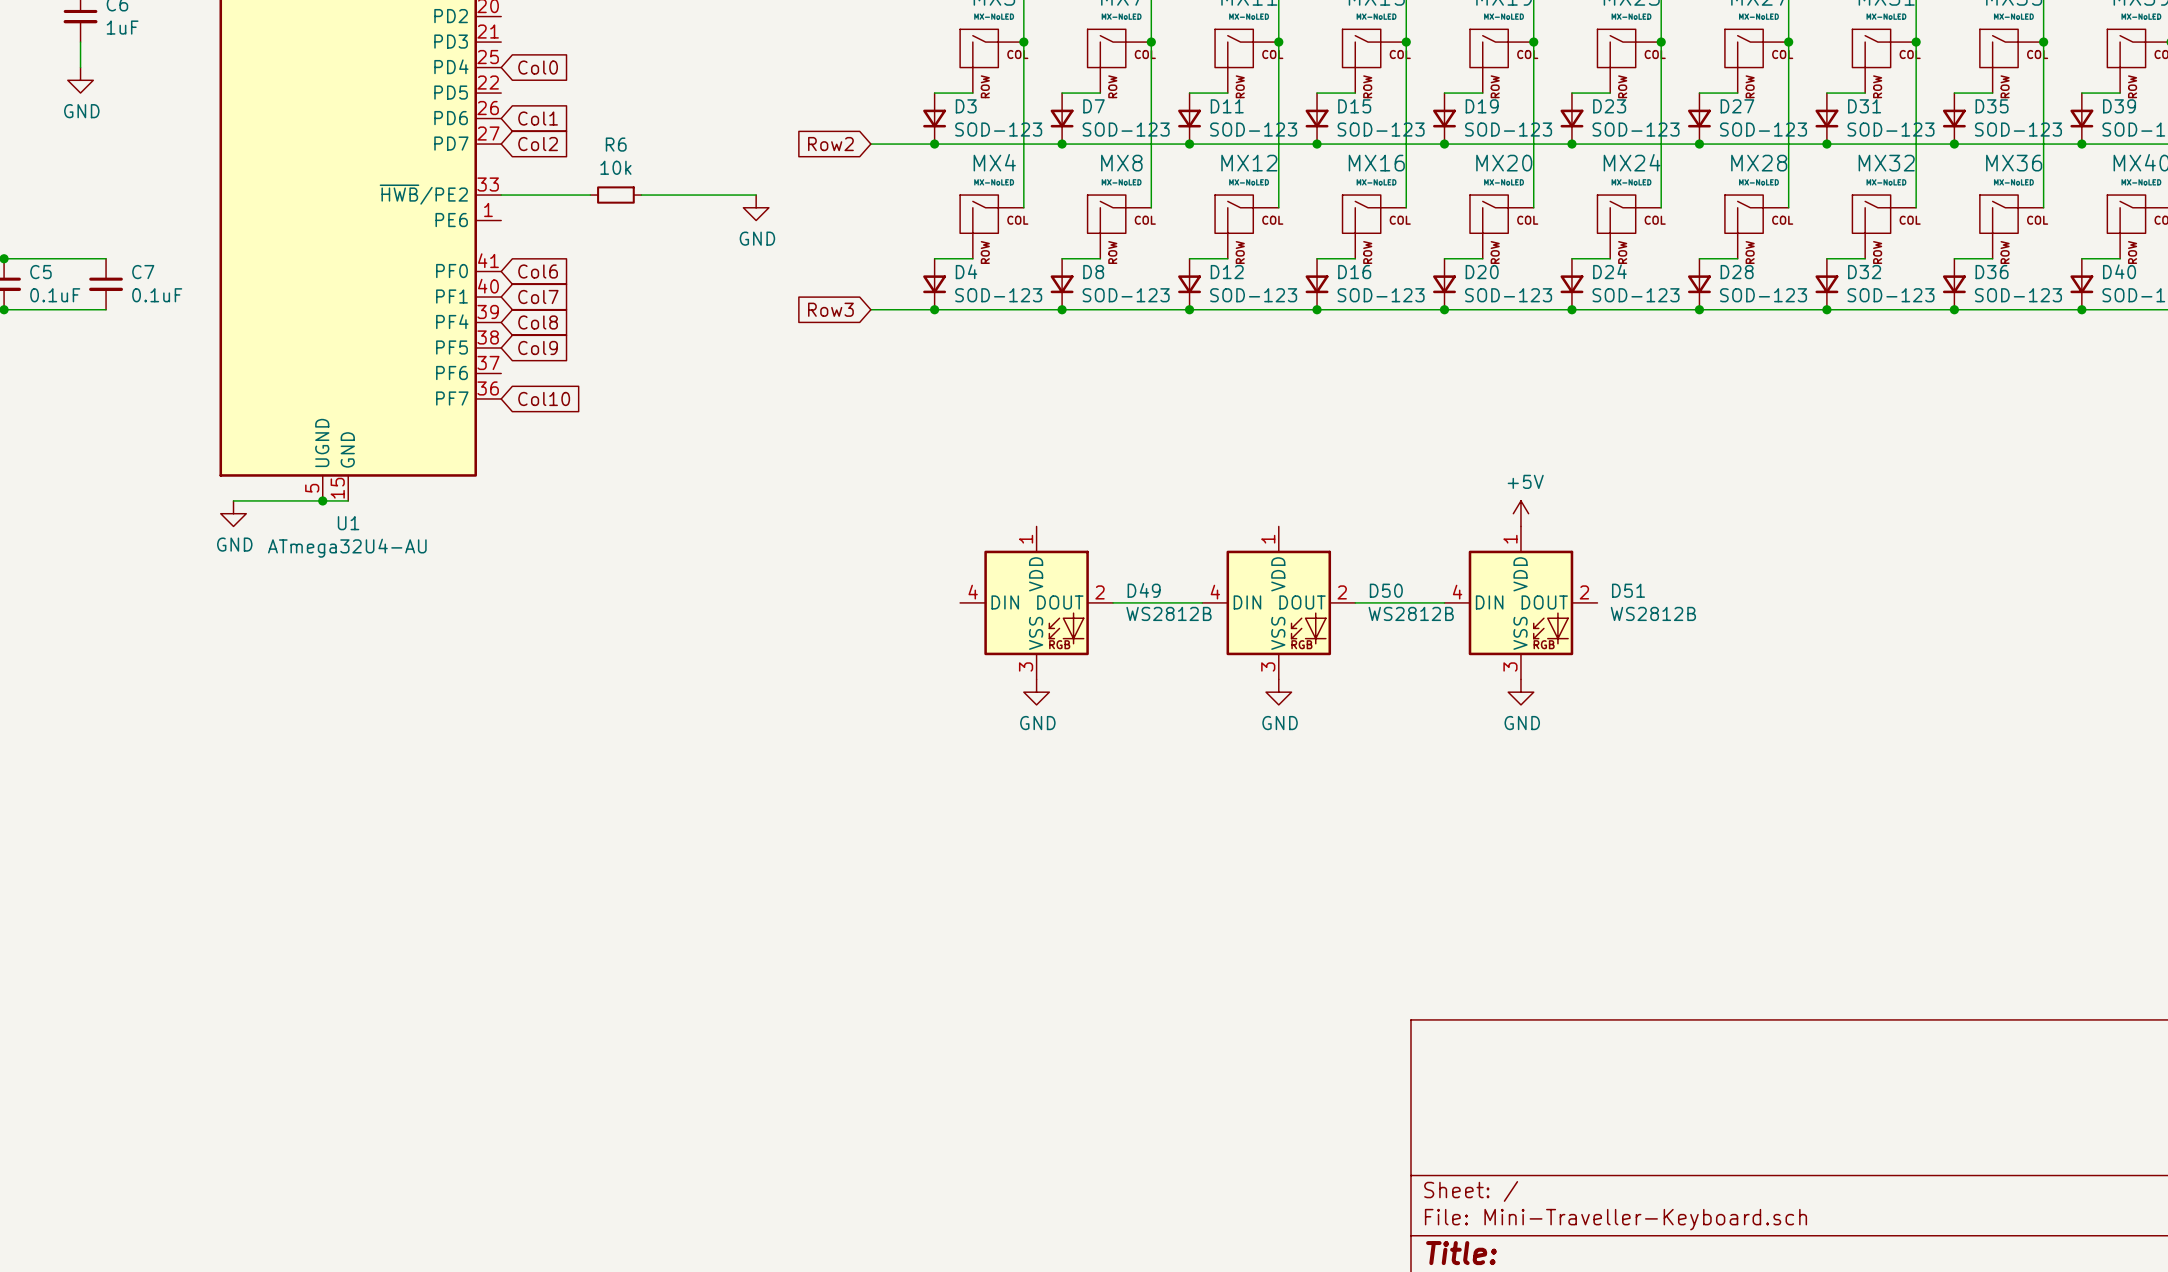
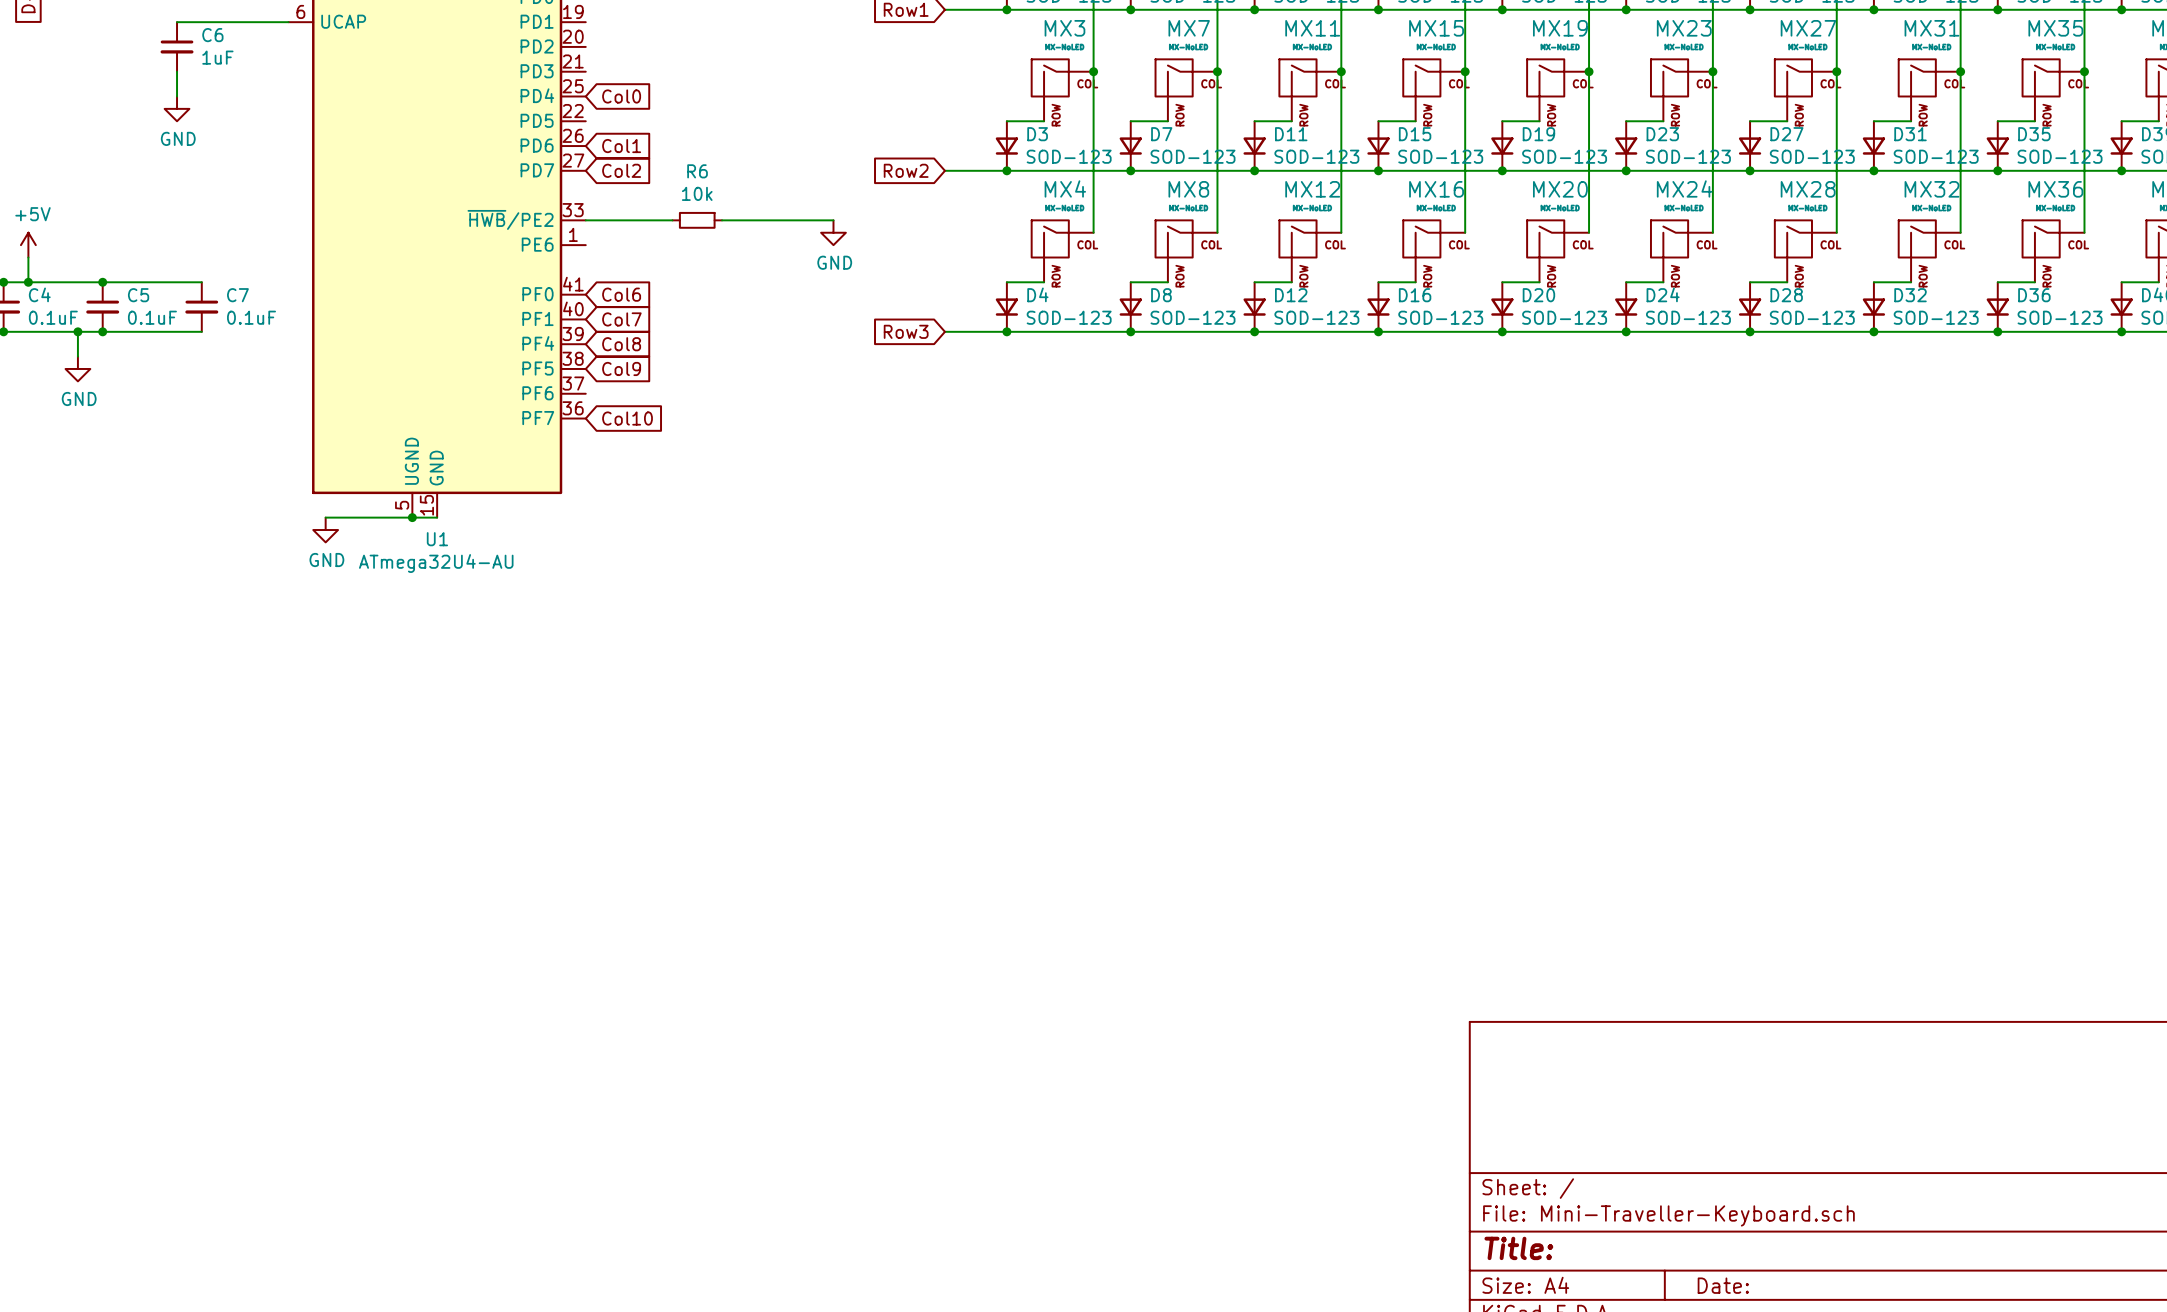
power symbol: +5V (1520, 513) -> none
D49: WS2812B (1036, 602) -> none
wire: (1113, 602) (1202, 602) -> none
D50: WS2812B (1278, 602) -> none
wire: (1355, 602) (1444, 602) -> none
D51: WS2812B (1520, 602) -> none
power symbol: GND (1036, 692) -> none
power symbol: GND (1278, 692) -> none
power symbol: GND (1520, 692) -> none

